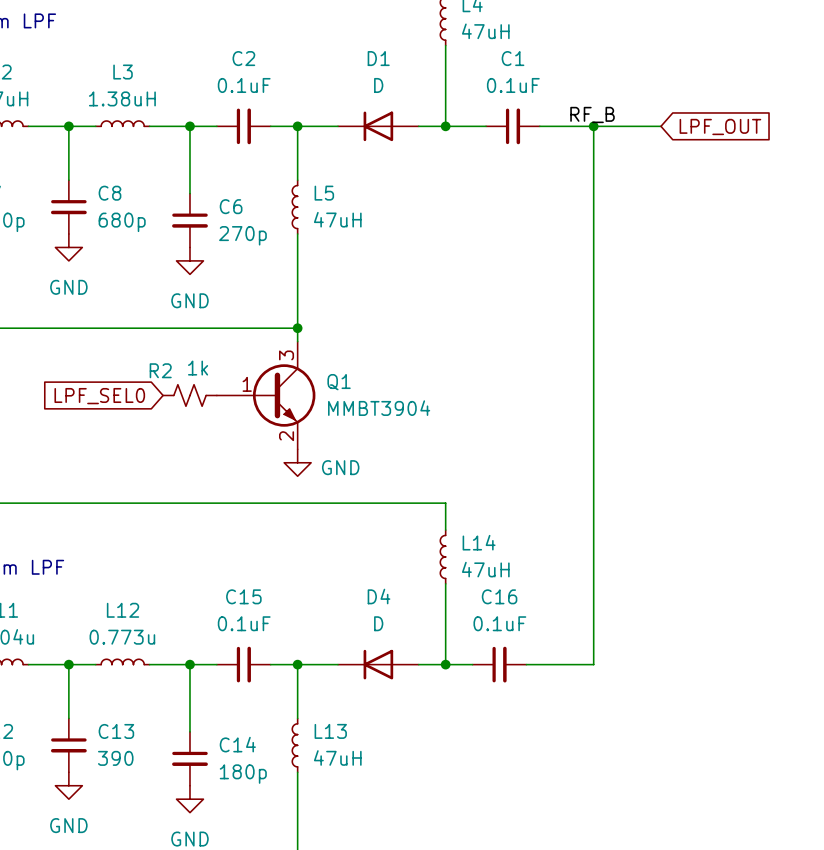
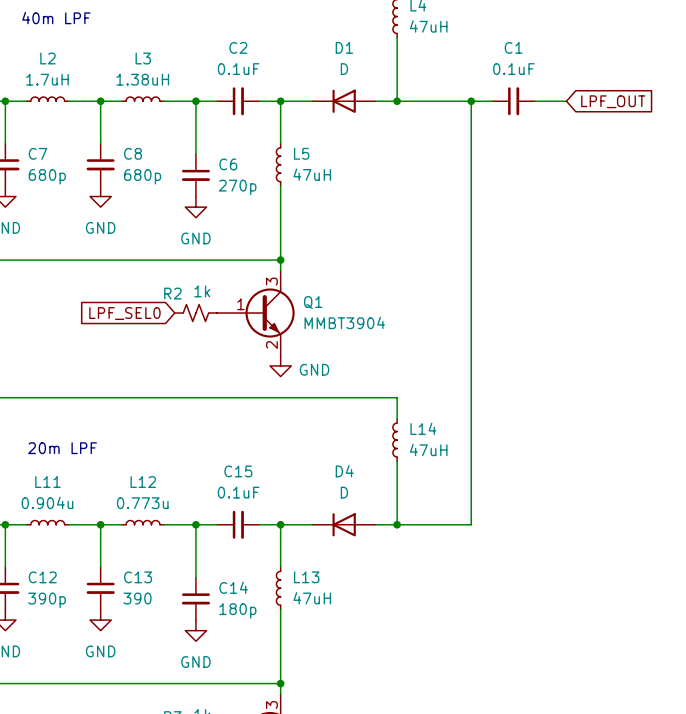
label: RF_B (592, 114) -> none
C1 position: (512, 126) -> (513, 101)
wire: (593, 126) (593, 664) (539, 664) -> (428, 101) (471, 101) (471, 524)
junction position: (593, 126) -> (471, 101)
C16: 0.1uF (499, 664) -> none

